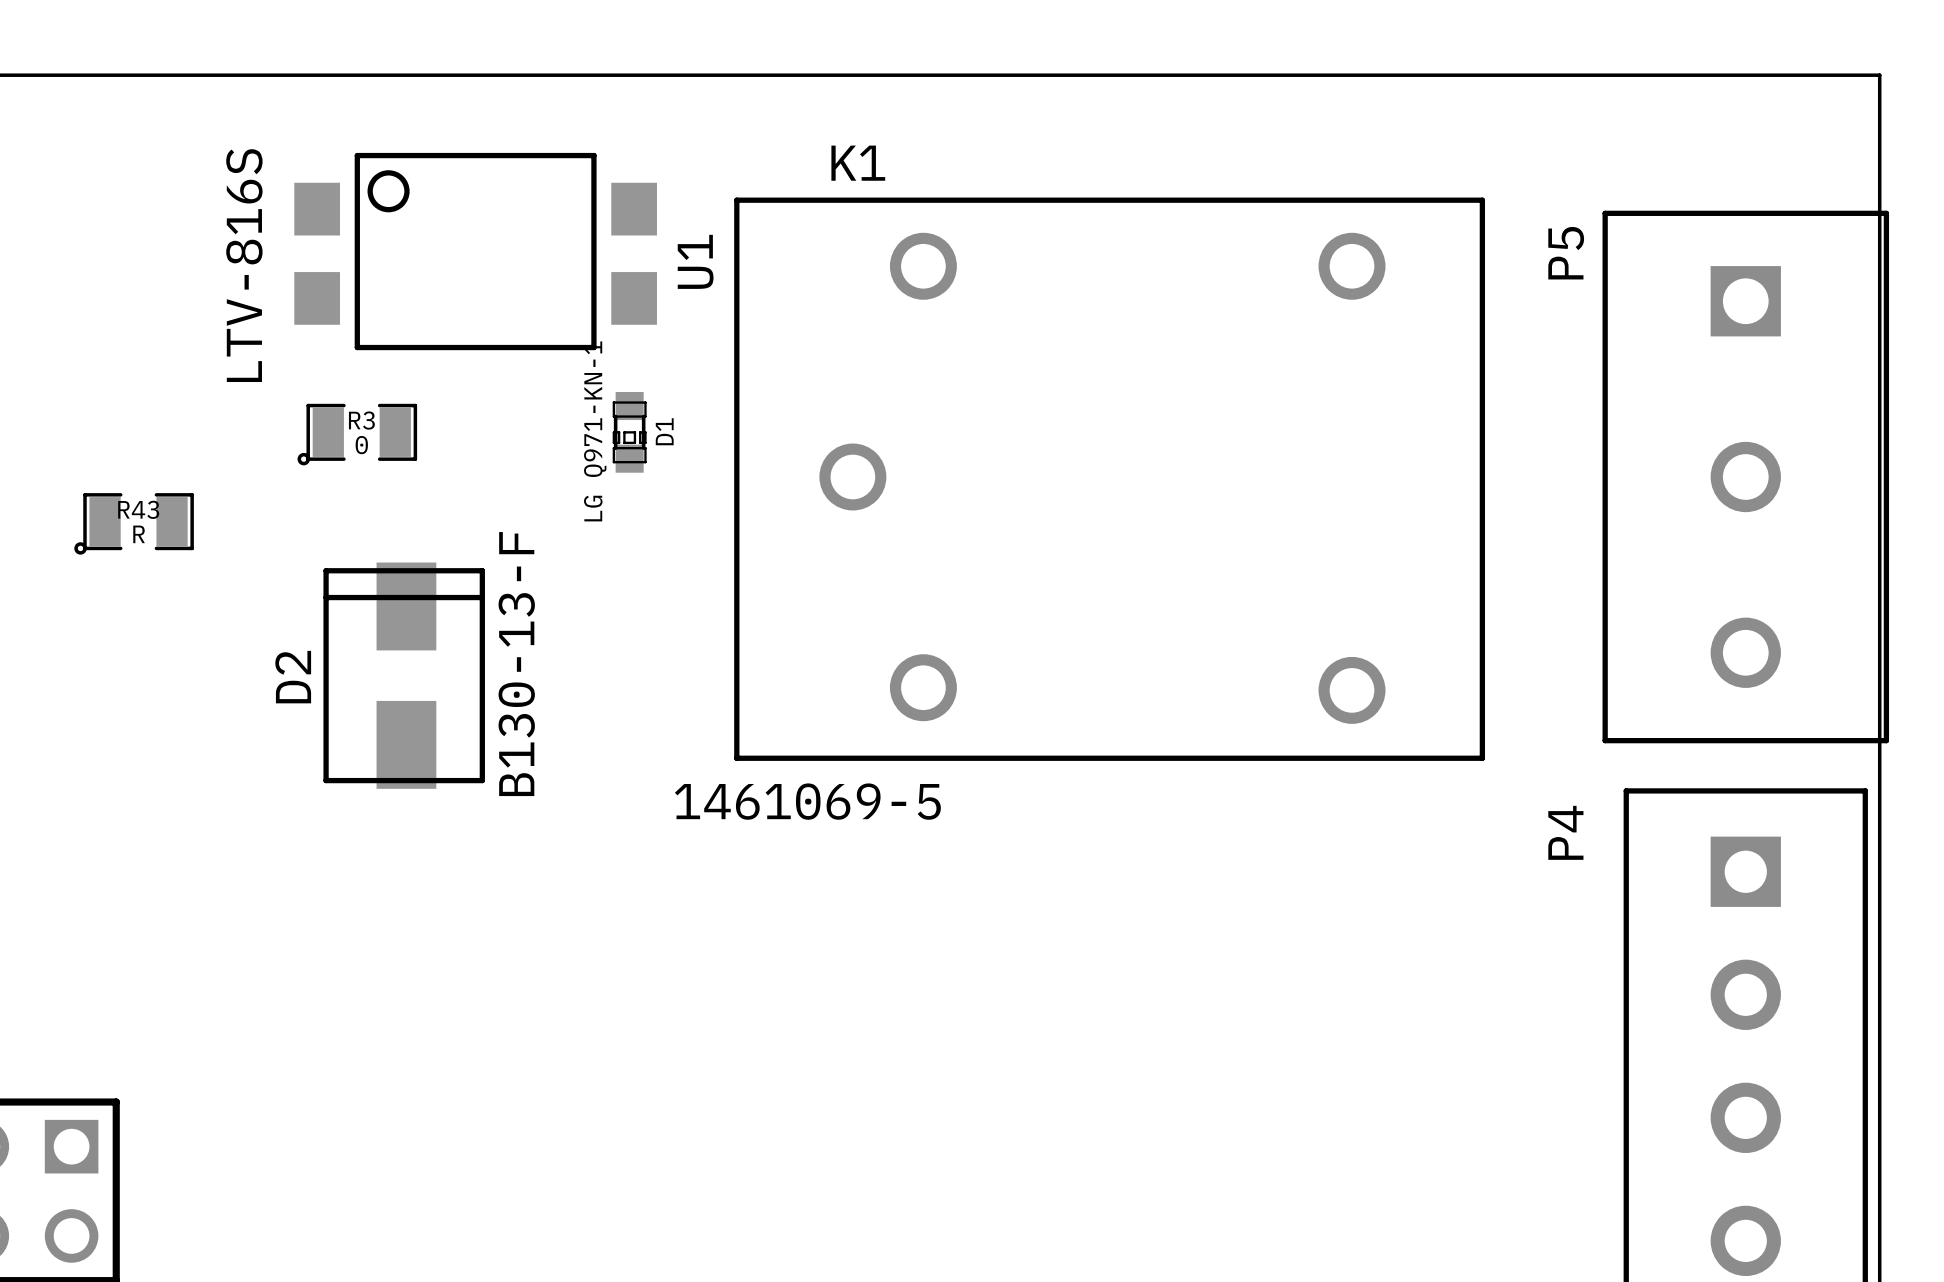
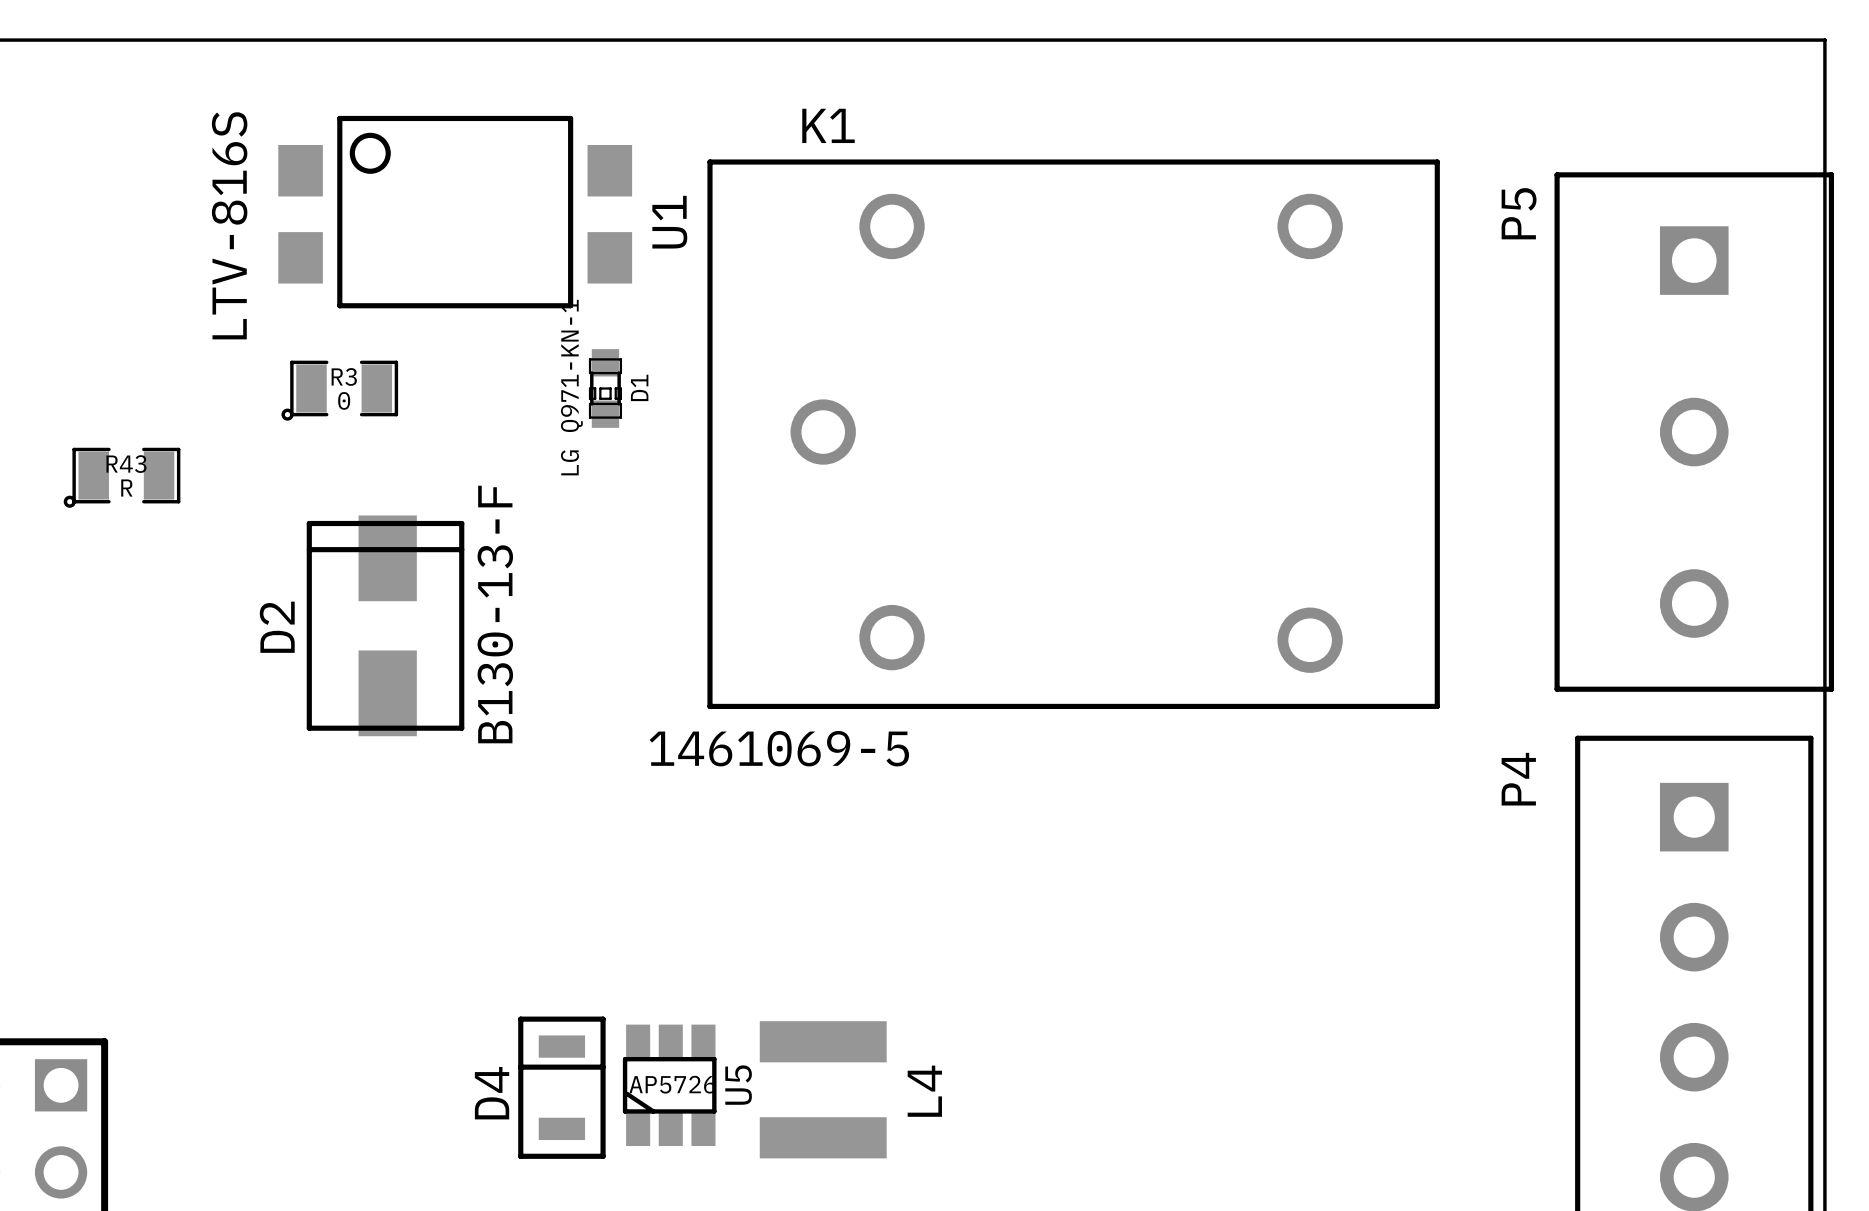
U5: none -> AP5726 (669, 1085)
D4: none -> (561, 1087)
L4: none -> (823, 1089)

